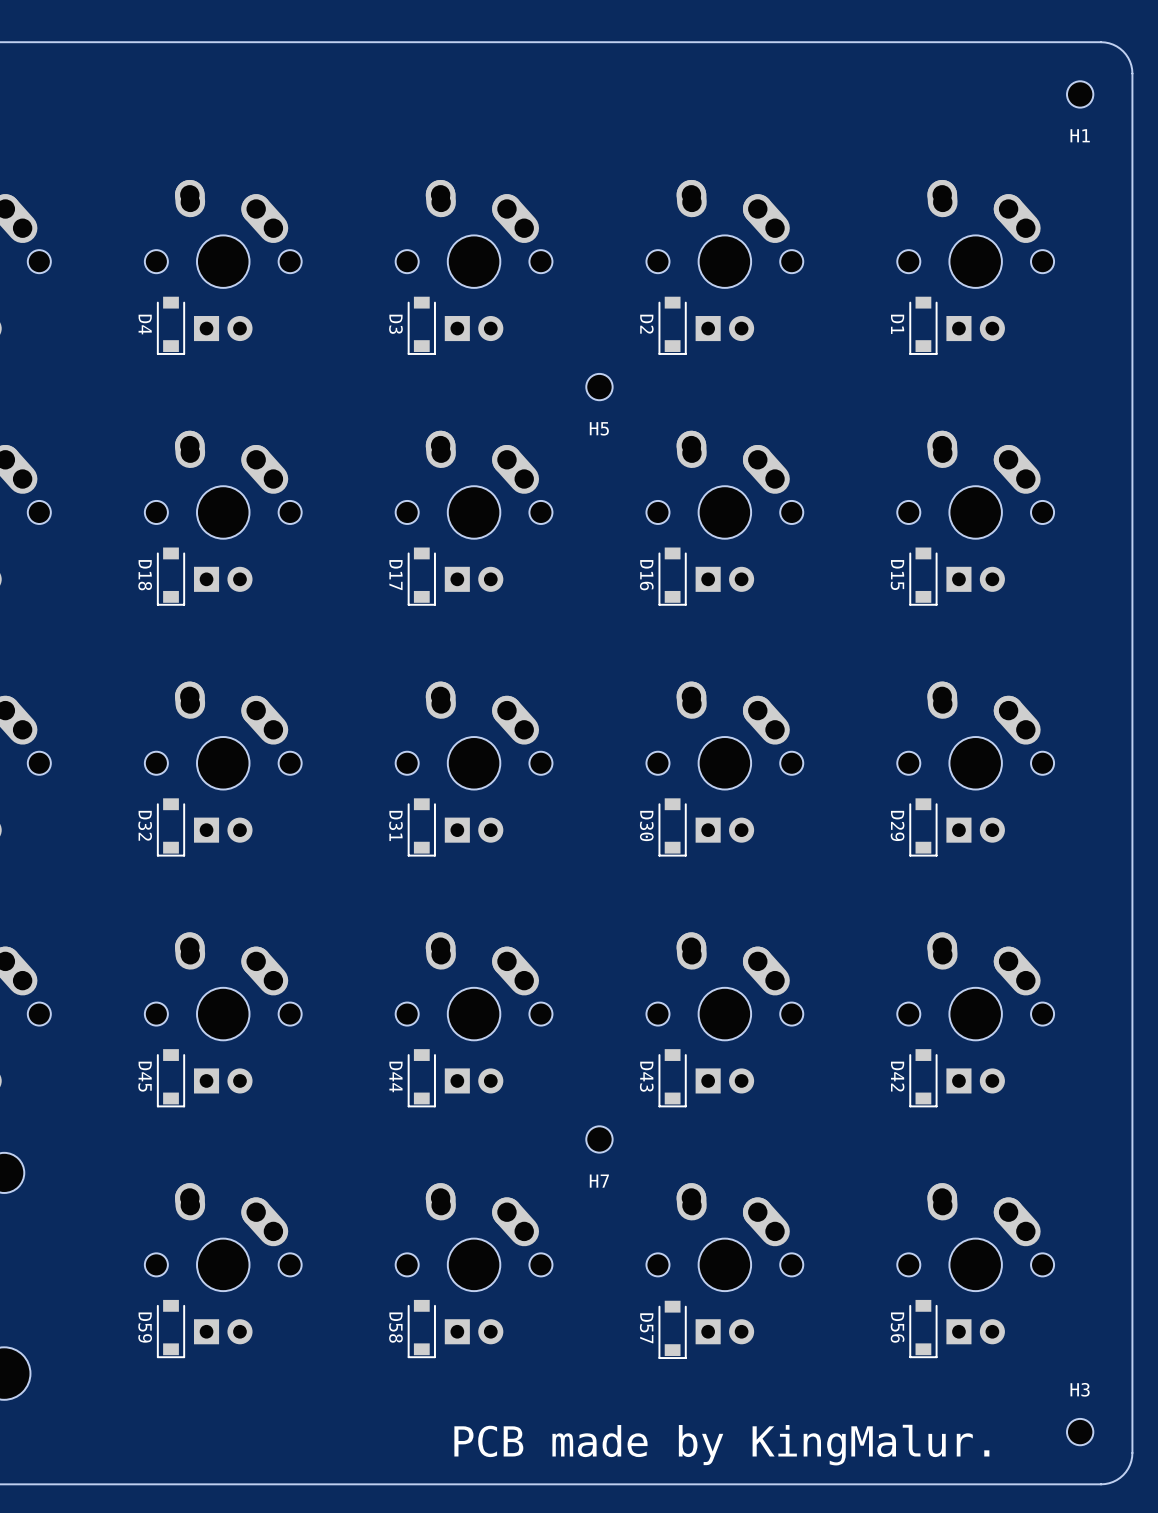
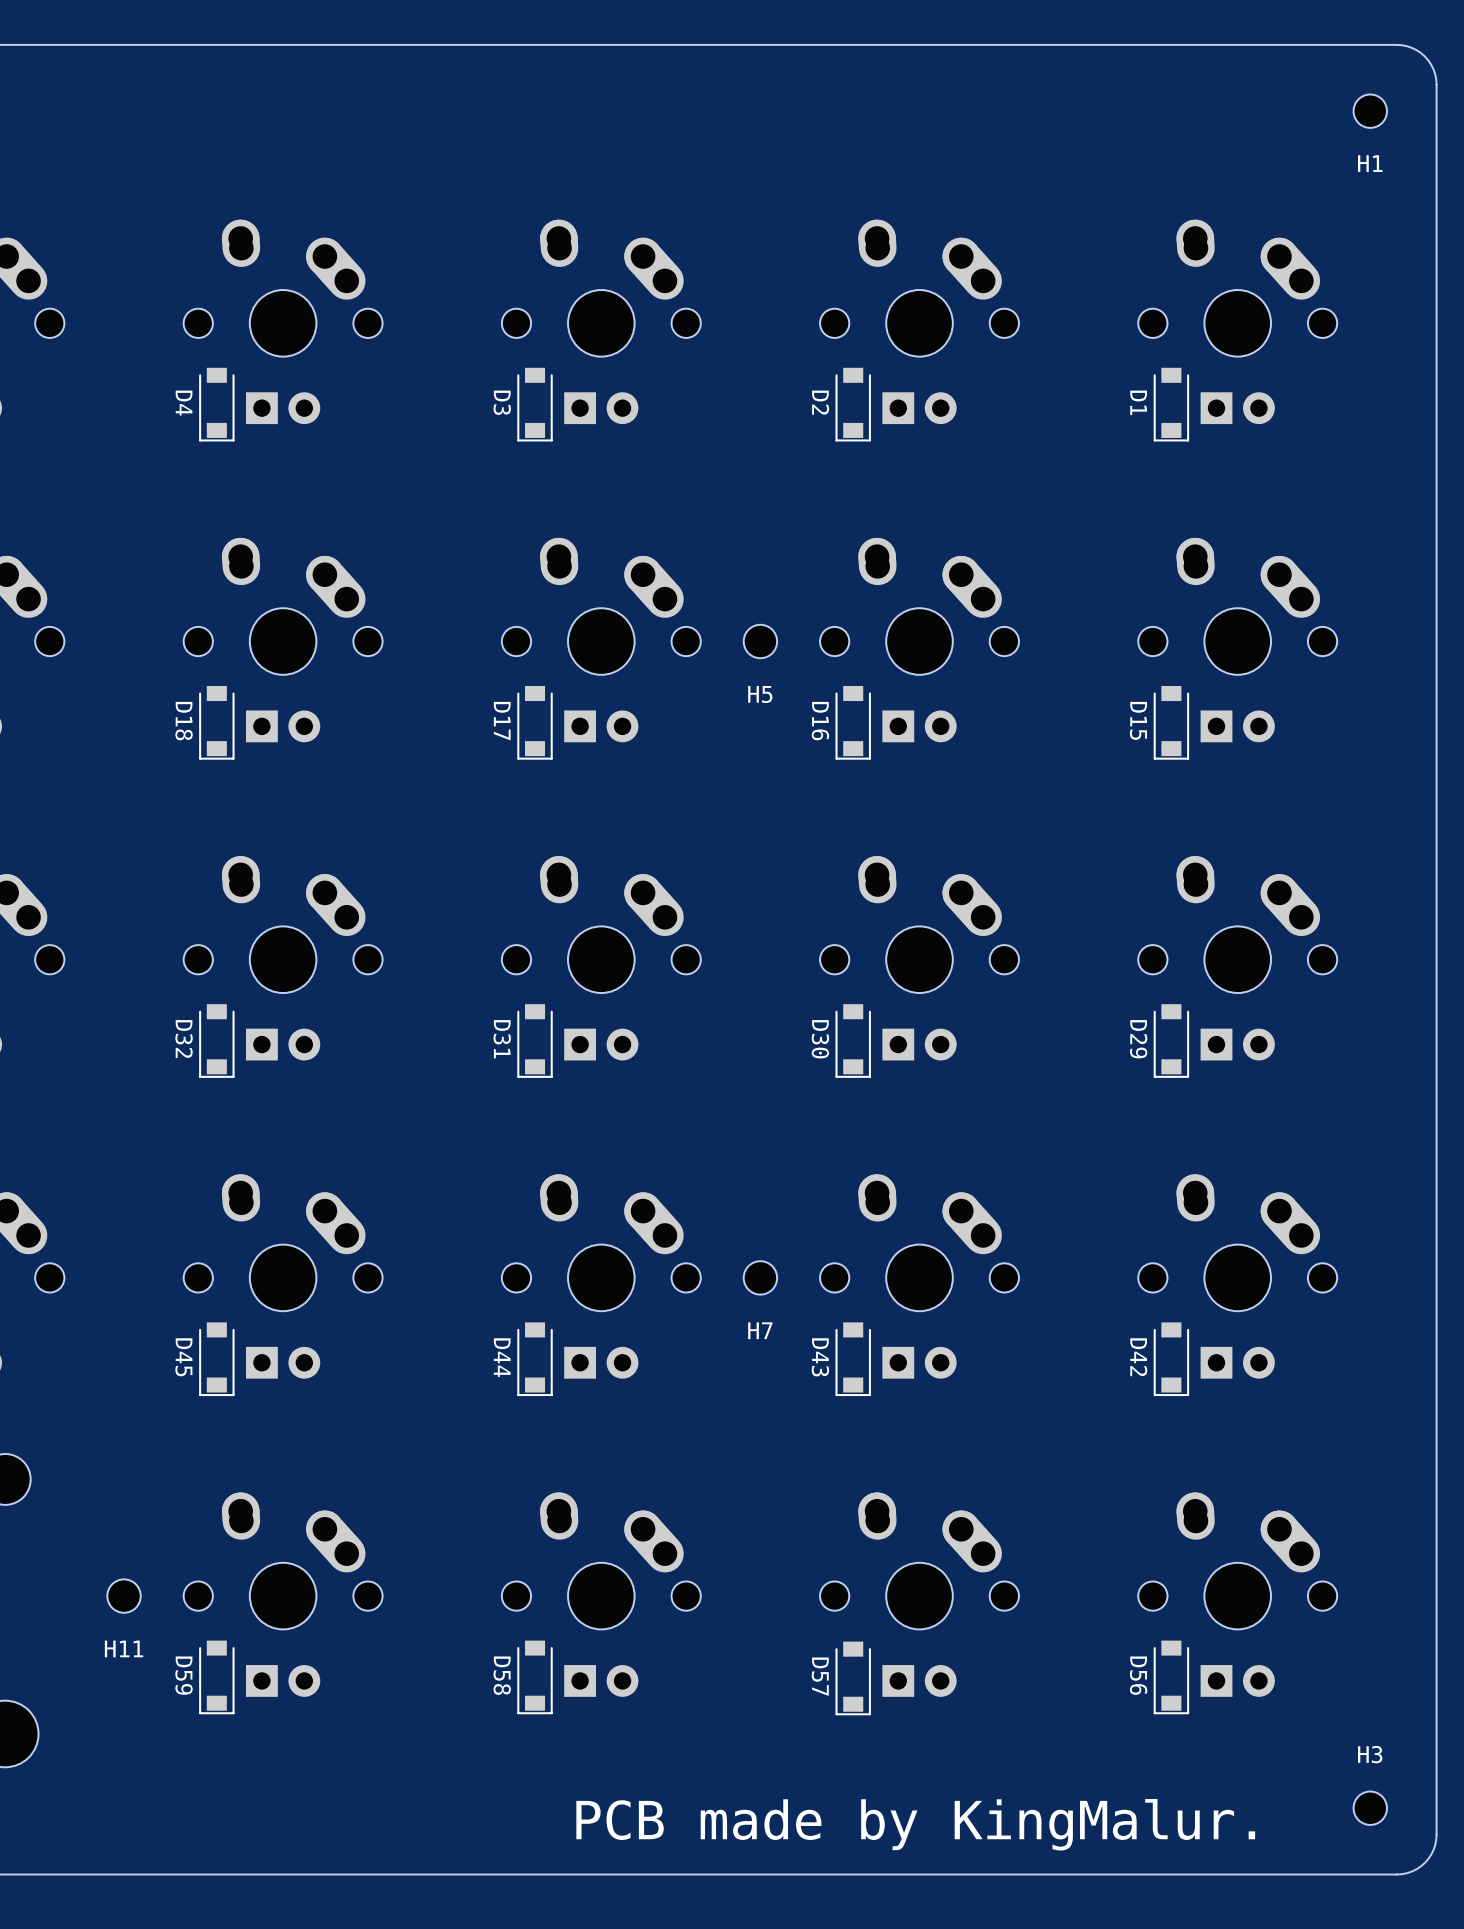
H5 position: (599, 387) -> (760, 641)
H7 position: (599, 1139) -> (760, 1277)
H11: none -> (124, 1596)

